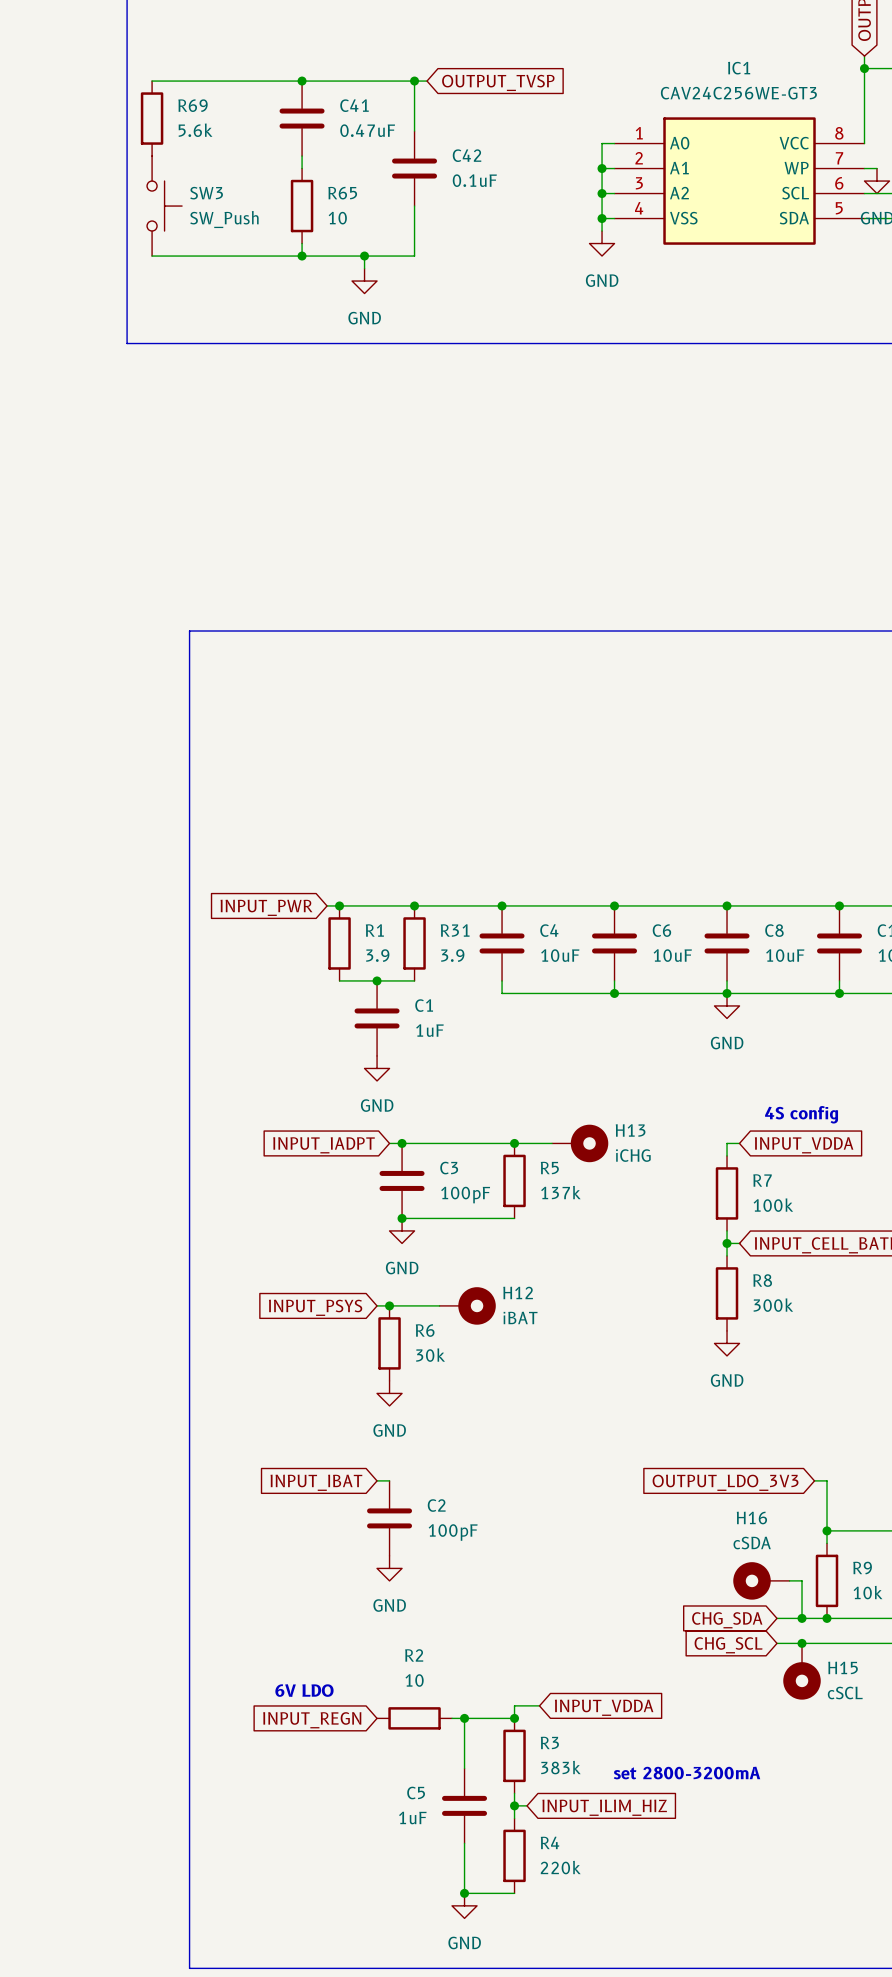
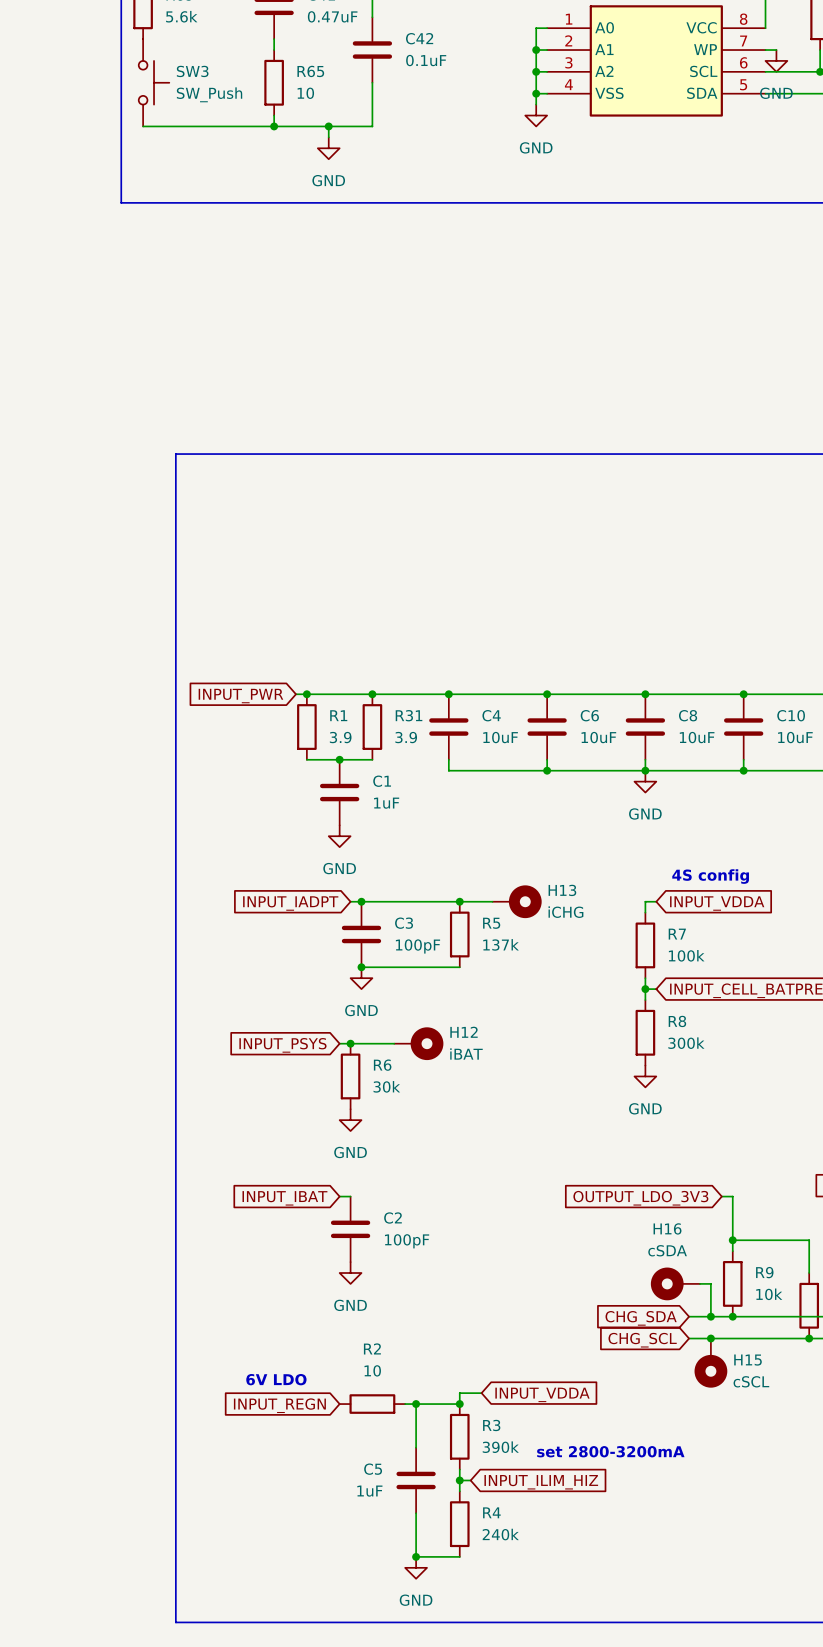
R3 value: 383k (560, 1767) -> 390k (500, 1447)
R4 value: 220k (560, 1867) -> 240k (500, 1534)

